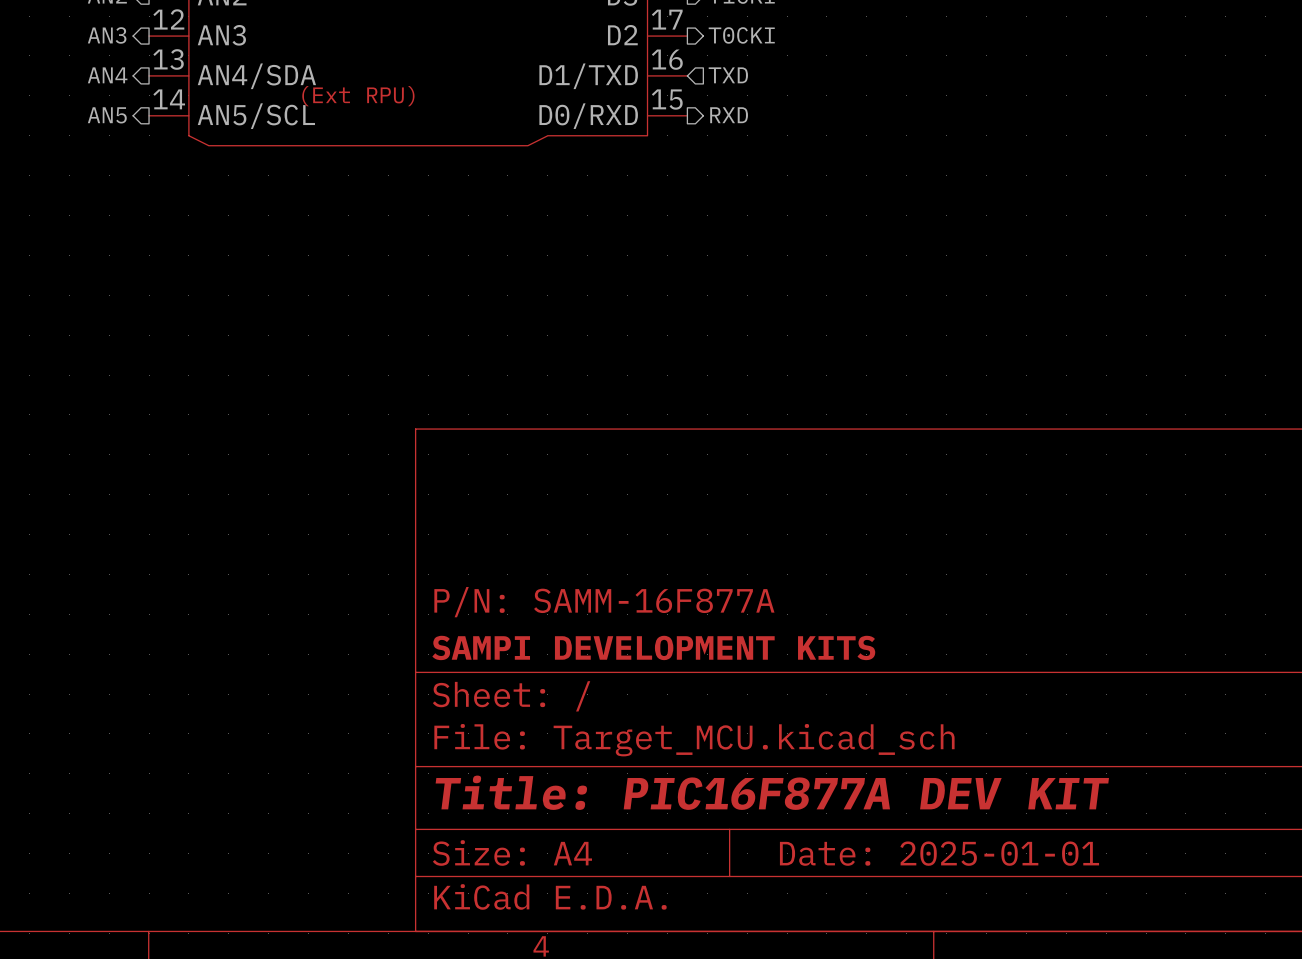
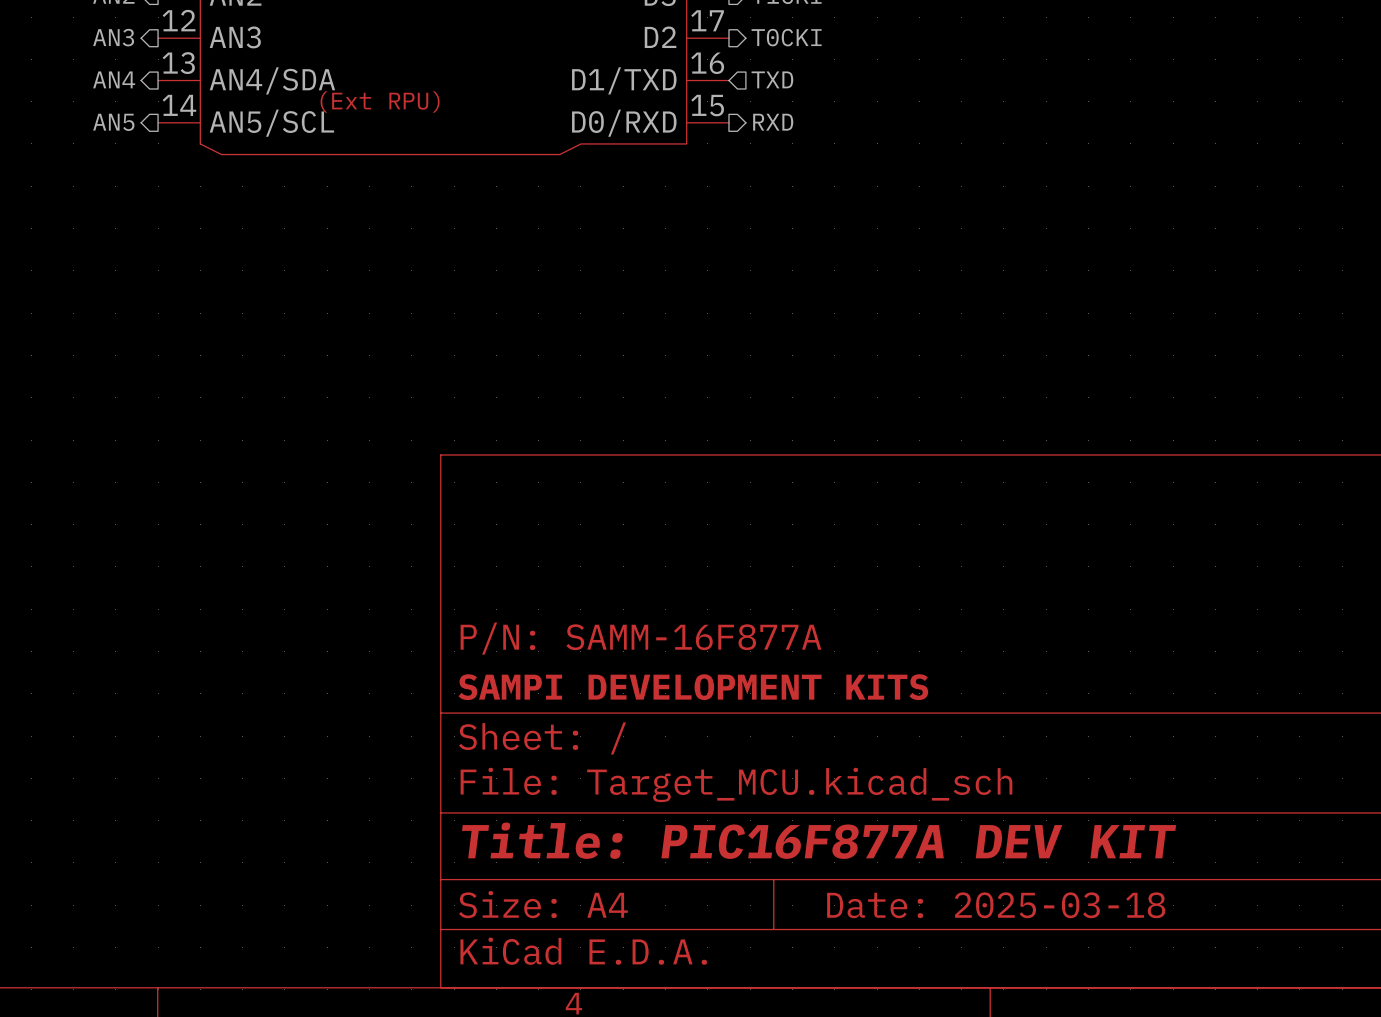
title block: Date: 2025-01-01 (939, 853) -> Date: 2025-03-18 (996, 905)

